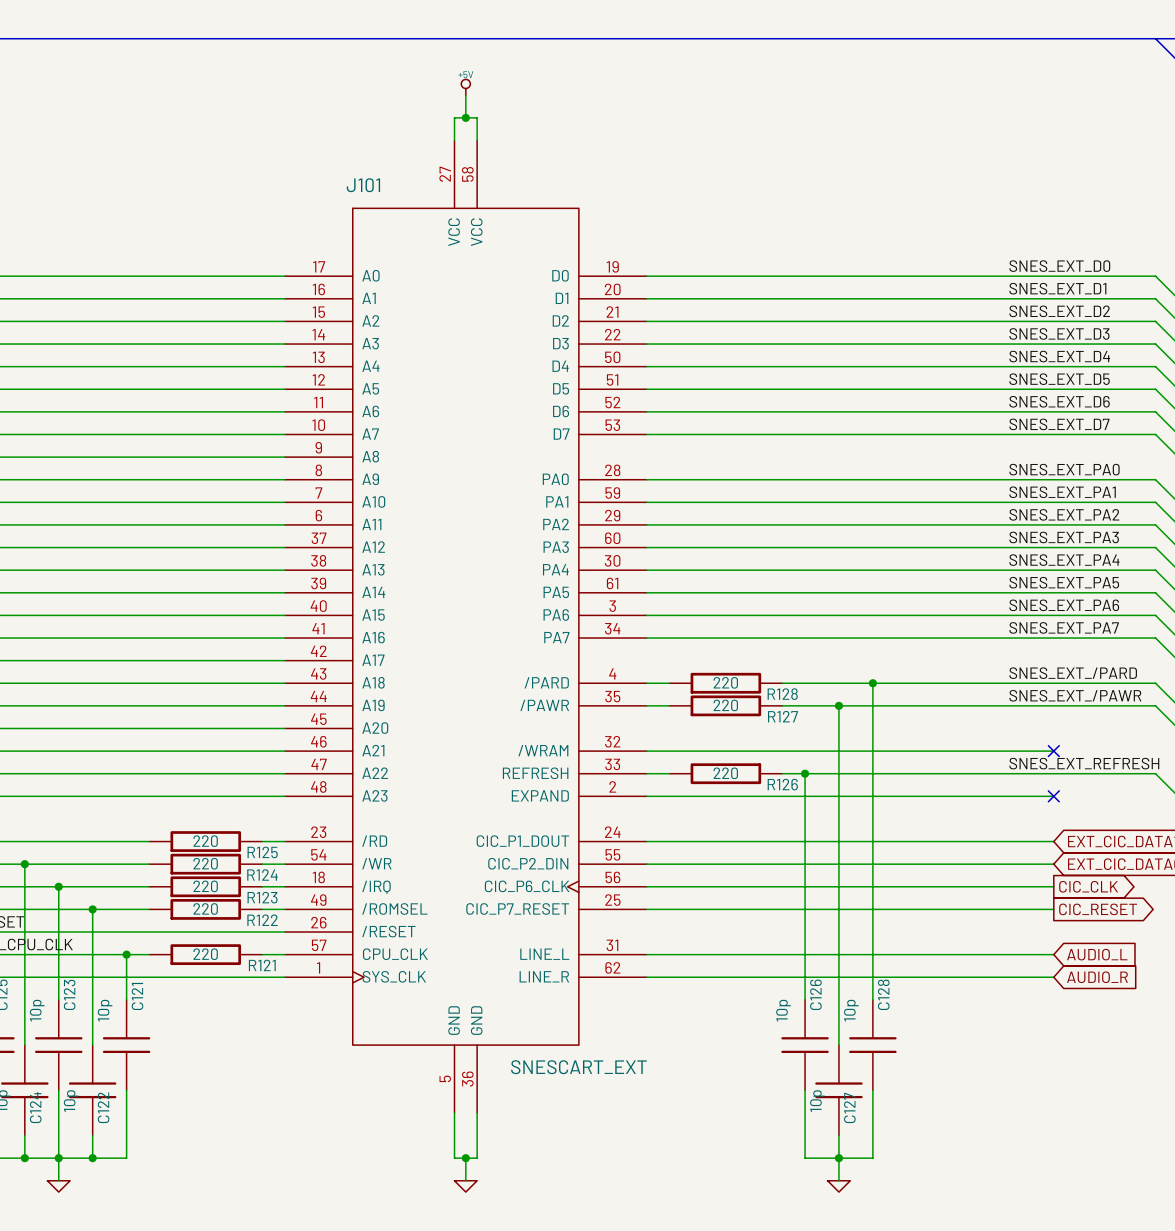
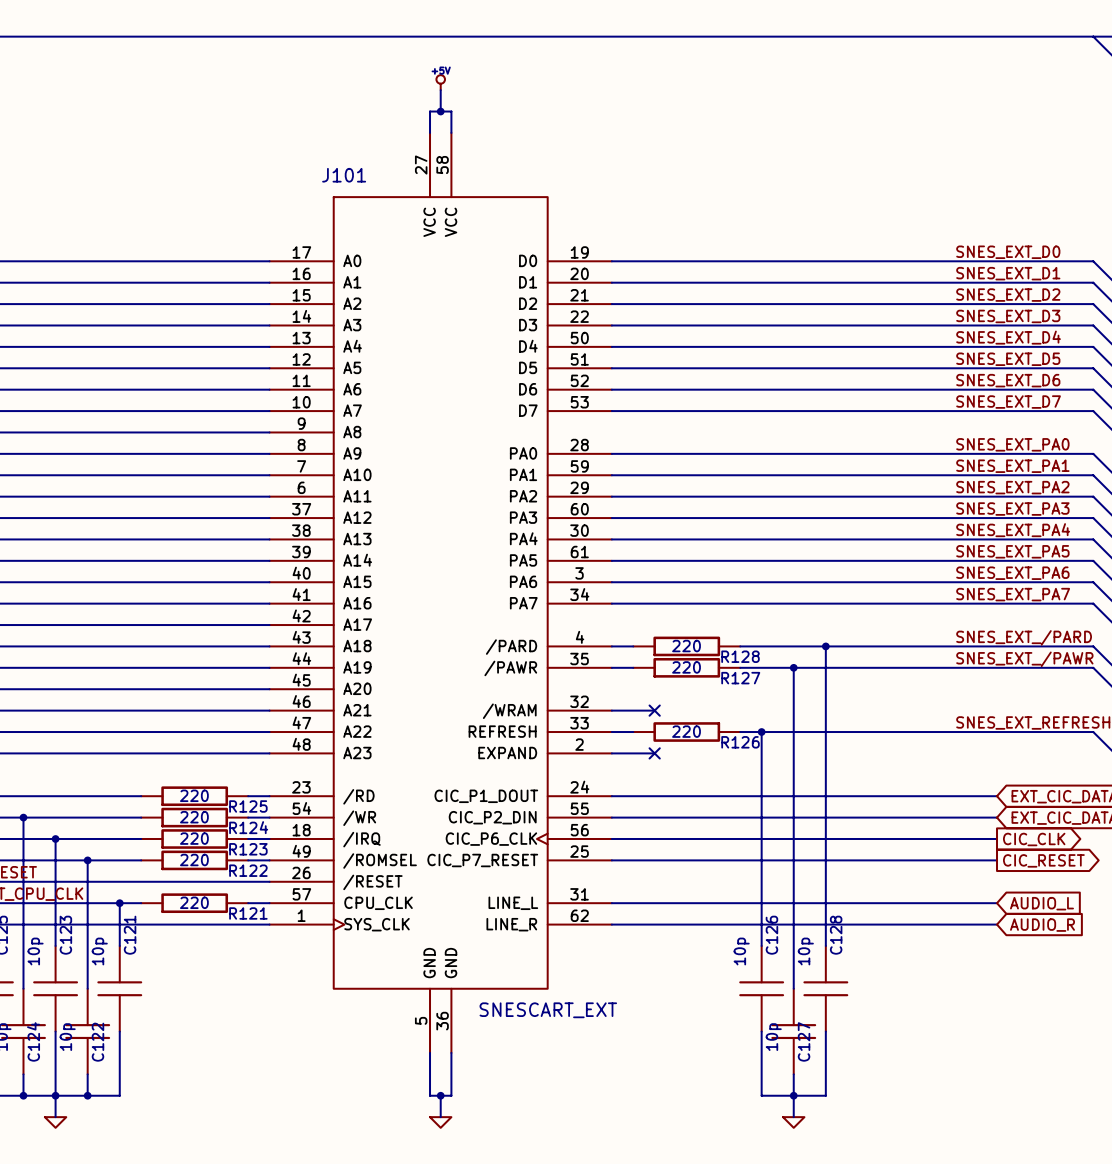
wire: (691, 751) (1053, 751) -> none
no-connect mark: none -> (654, 710)
no-connect mark: (1053, 751) -> none
wire: (691, 796) (1053, 796) -> none
no-connect mark: none -> (654, 753)
no-connect mark: (1053, 796) -> none

